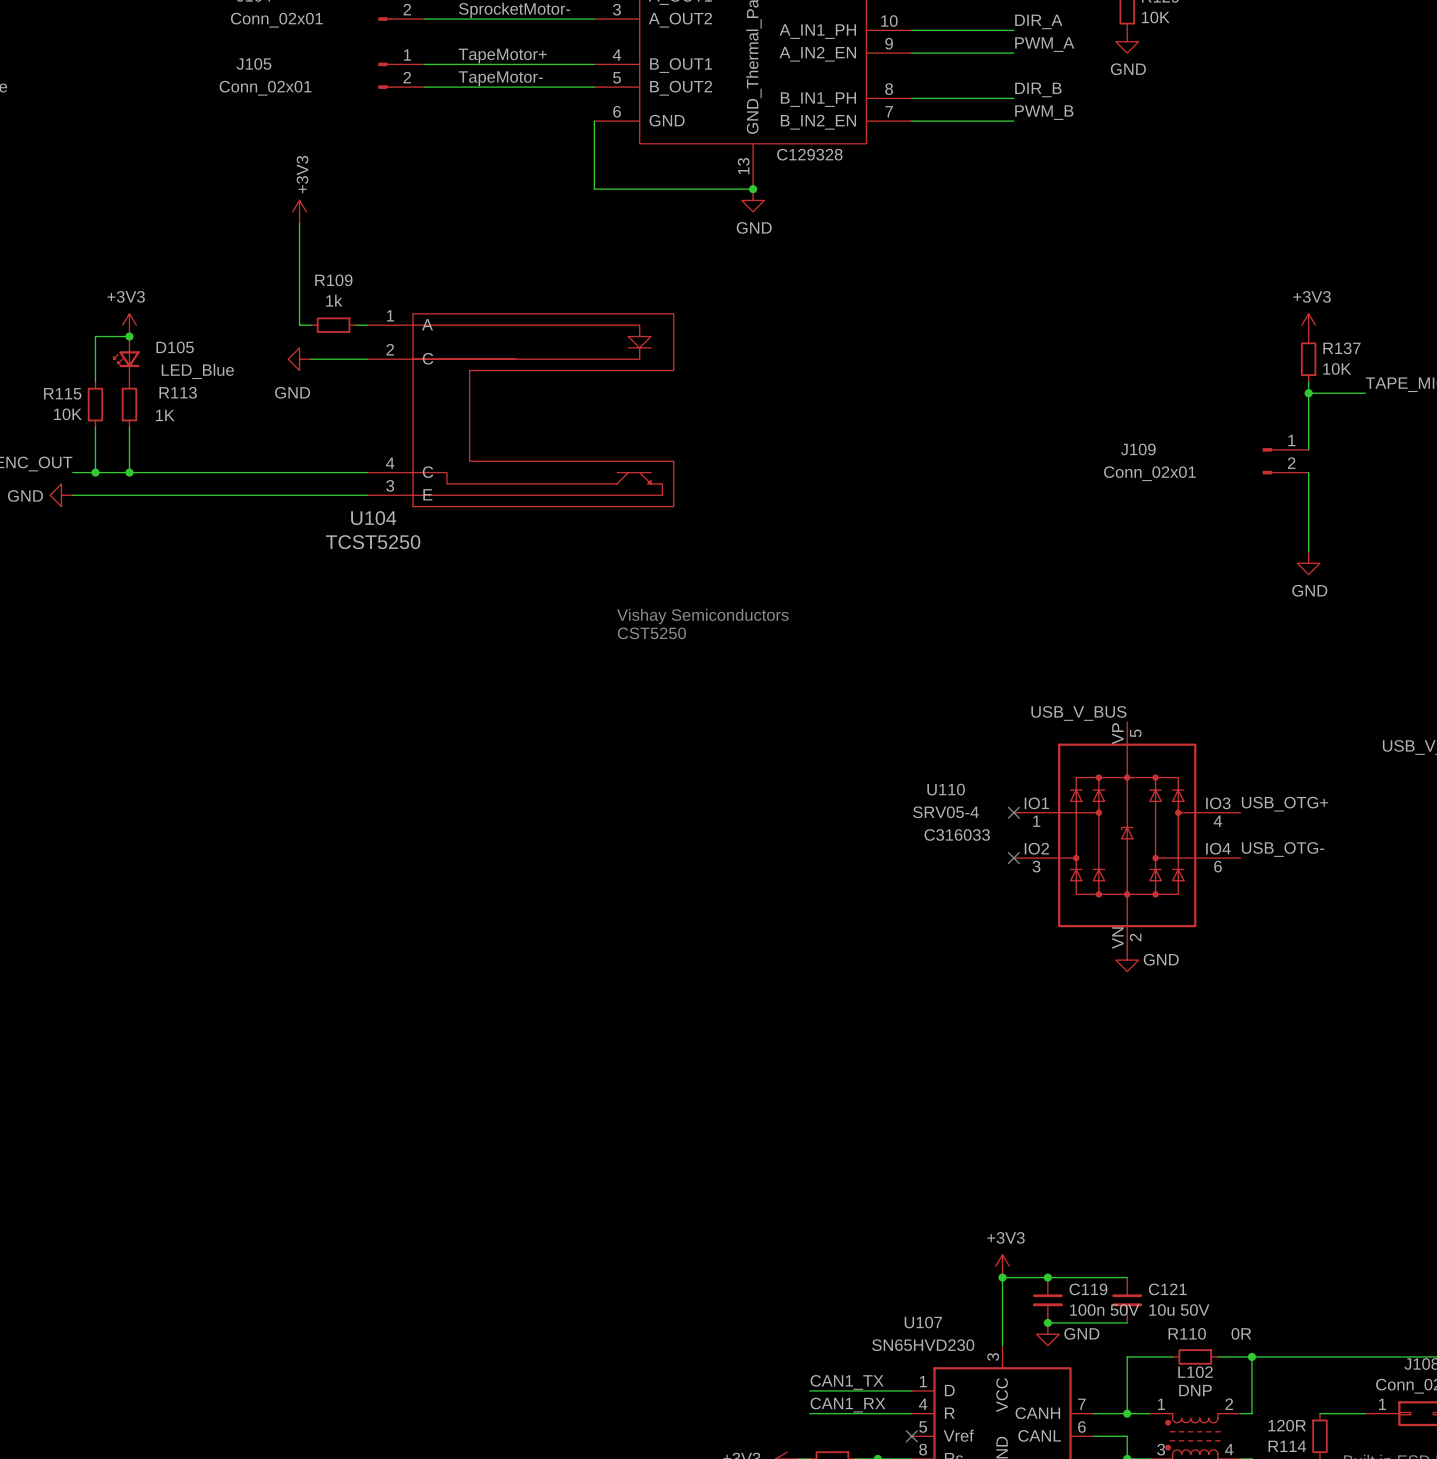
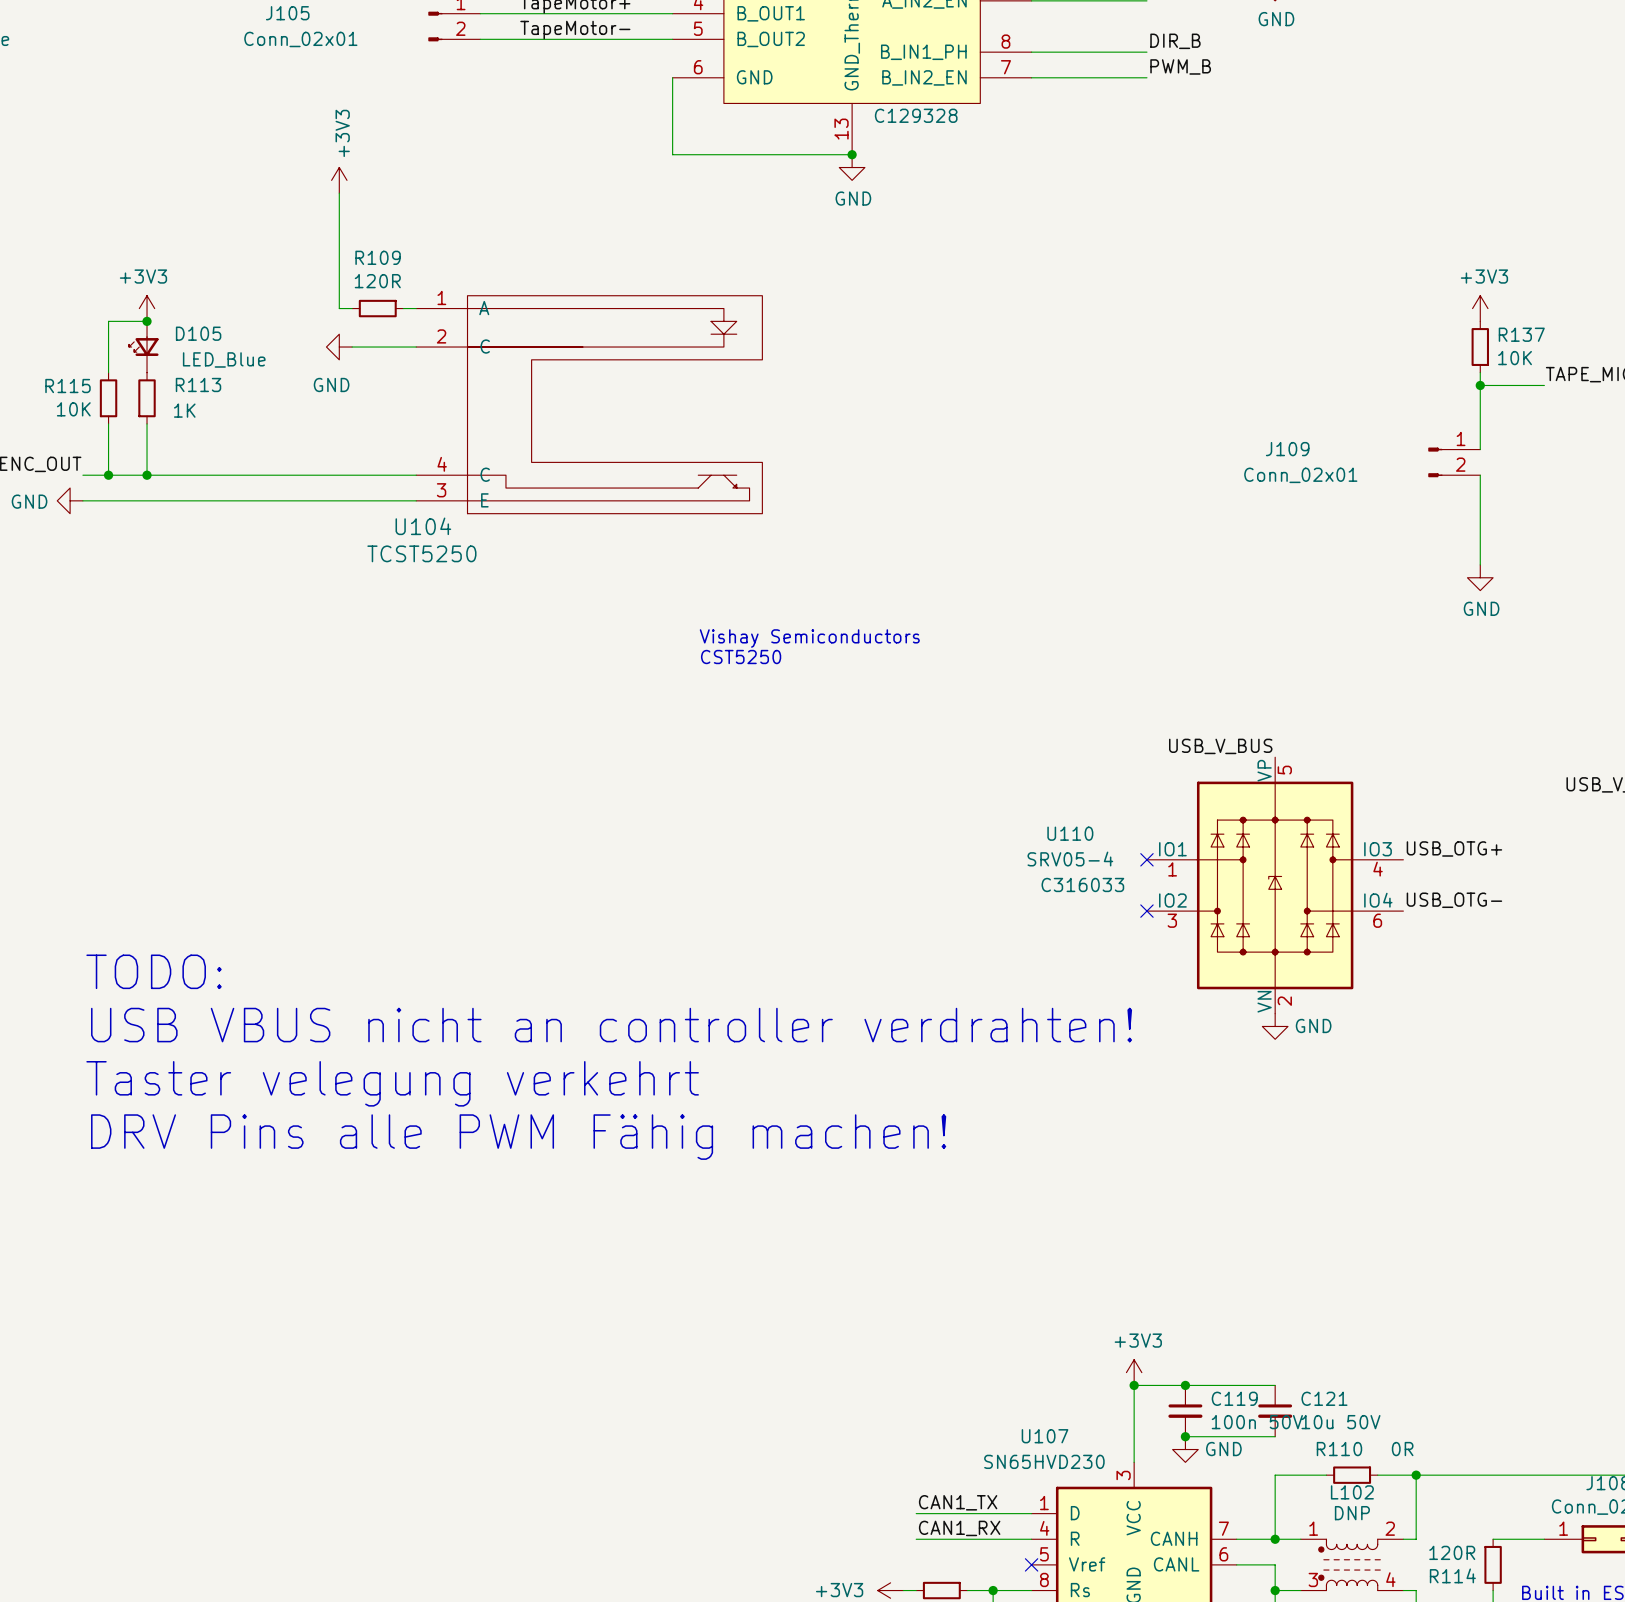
R109 value: 1k (334, 300) -> 120R (377, 281)
text: none -> TODO: (154, 971)
text: none -> USB VBUS nicht an controller verdrahten! (611, 1025)
text: none -> Taster velegung verkehrt (392, 1083)
text: none -> DRV Pins alle PWM Fähig machen! (518, 1137)

